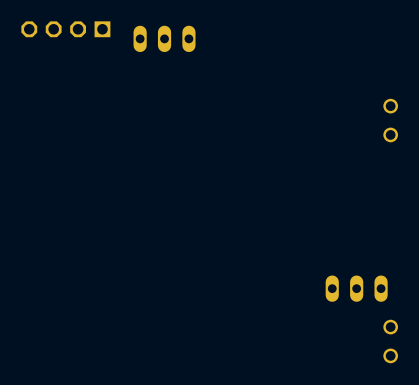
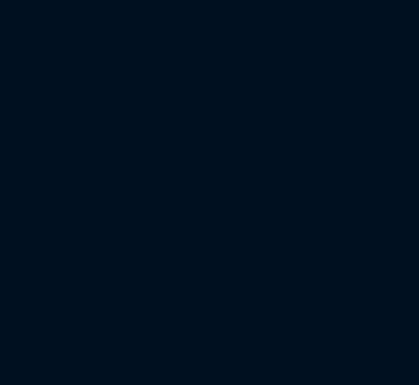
part: (65, 29) -> none
part: (164, 38) -> none
part: (390, 106) -> none
part: (390, 134) -> none
part: (356, 288) -> none
part: (390, 327) -> none
part: (390, 355) -> none

